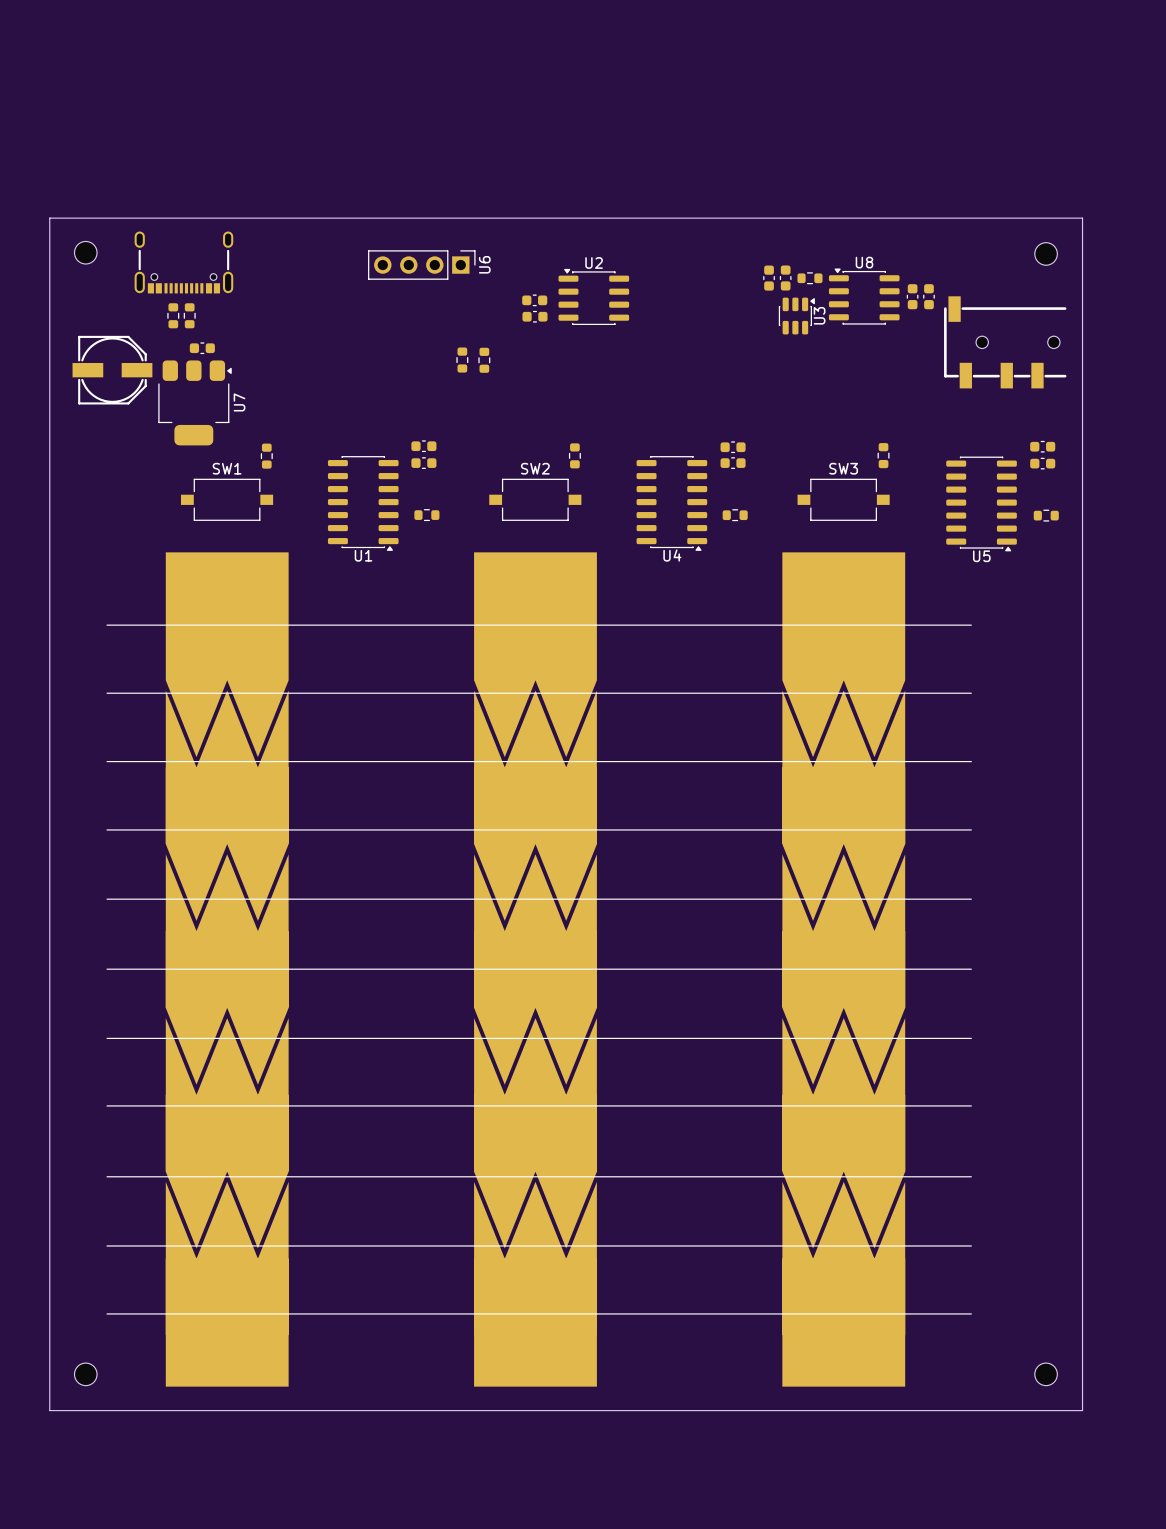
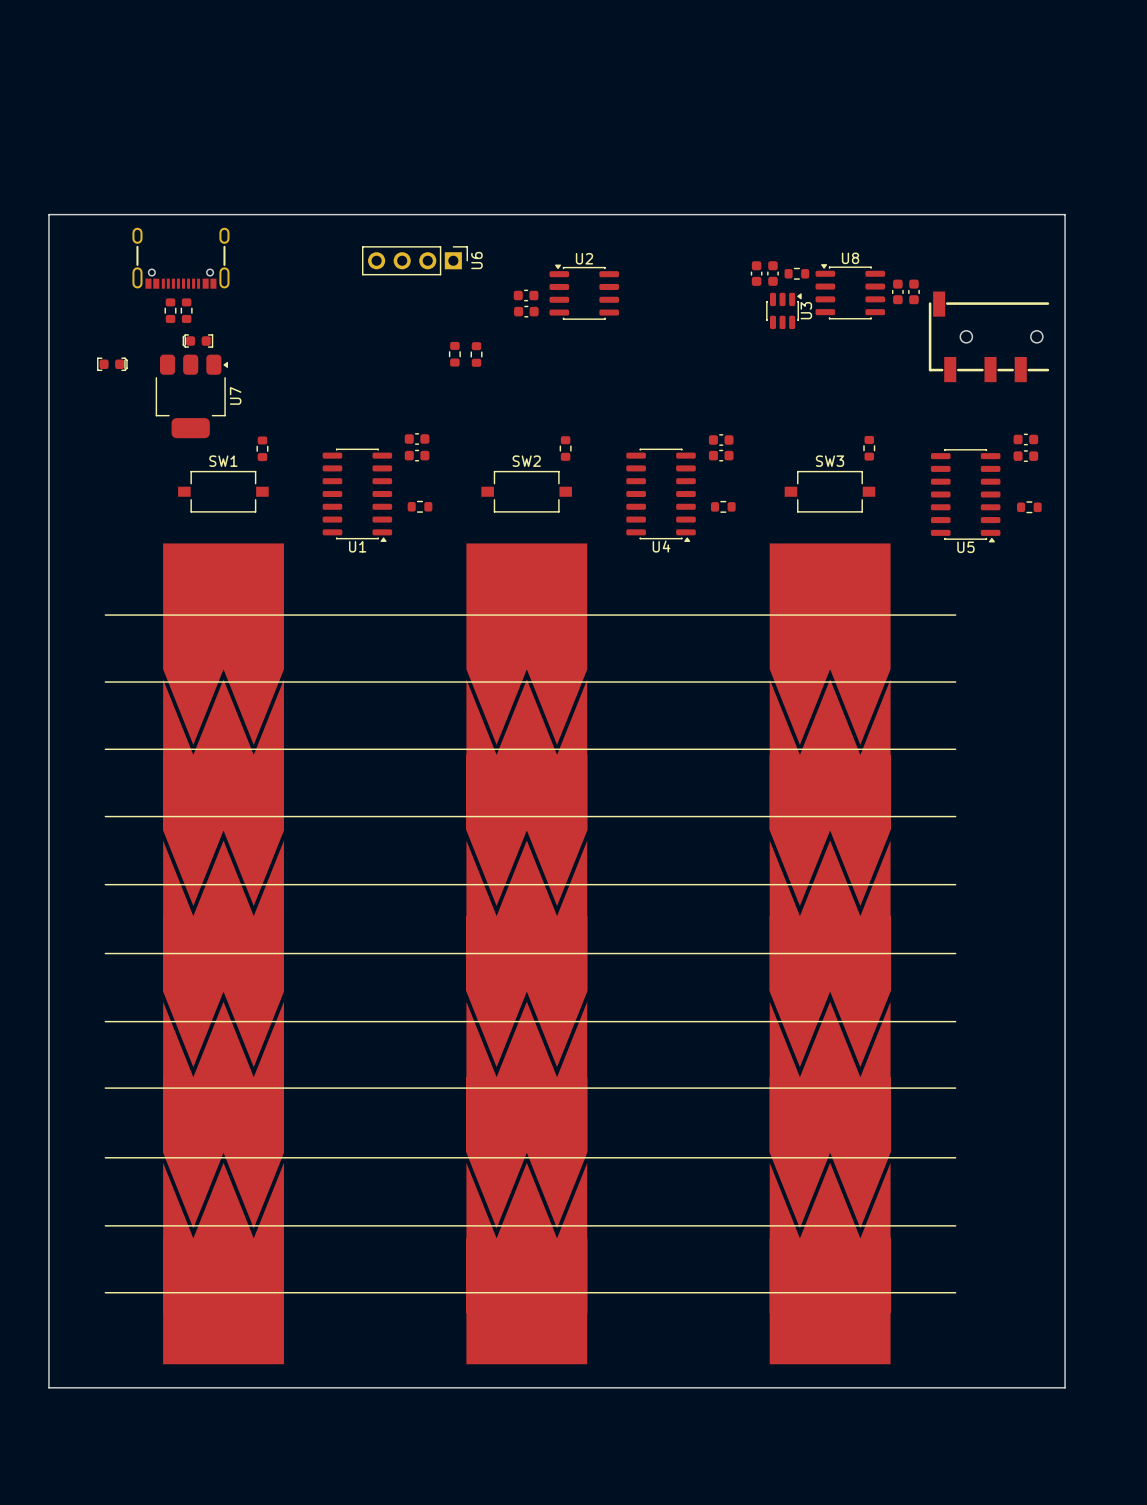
part: (85, 252) -> none
part: (1046, 253) -> none
part footprint: [72, 335, 153, 405] -> [97, 357, 128, 371]
part footprint: [189, 342, 215, 355] -> [182, 334, 214, 348]
part: (85, 1374) -> none
part: (1046, 1374) -> none

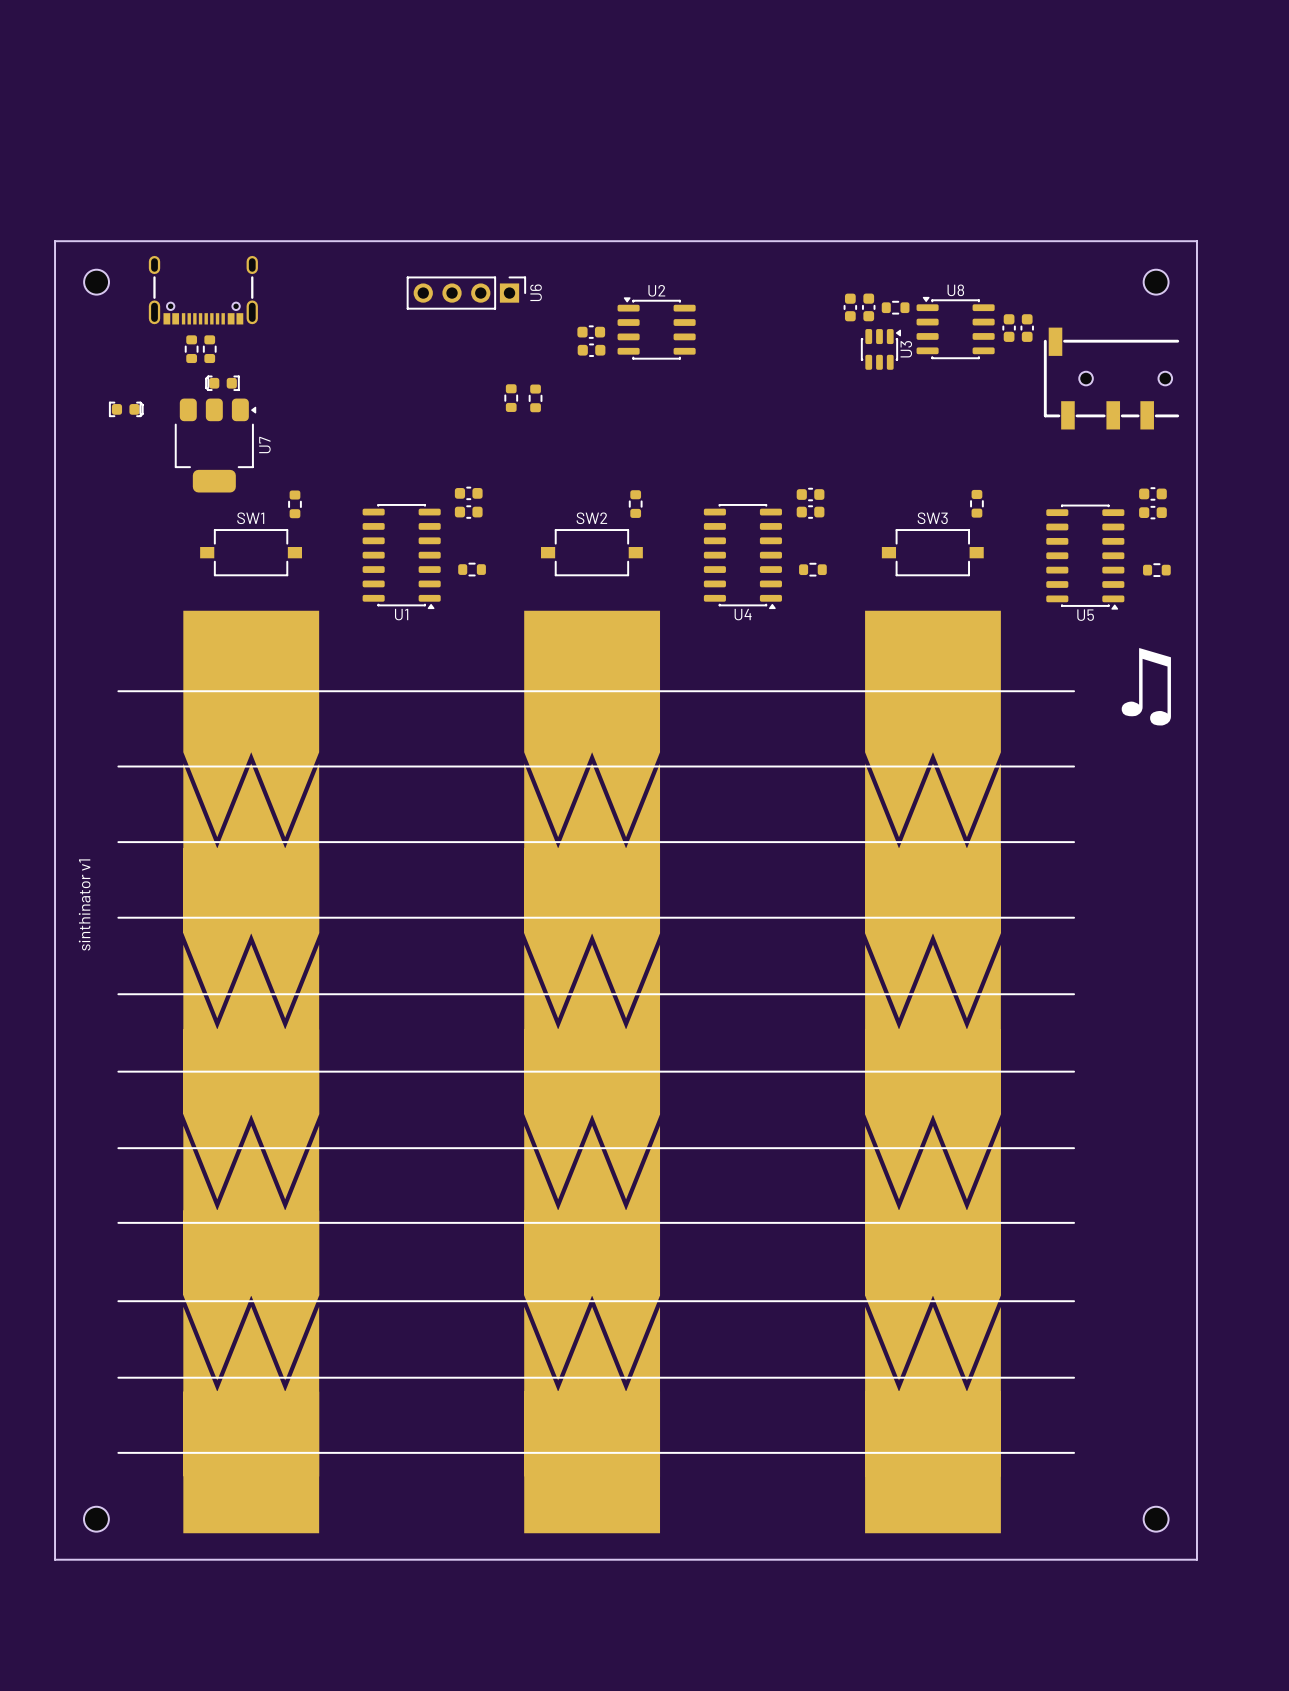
part: none -> (96, 282)
part: none -> (1156, 282)
text: none -> ♫ (1146, 686)
text: none -> sinthinator v1 (84, 904)
part: none -> (96, 1519)
part: none -> (1156, 1519)

